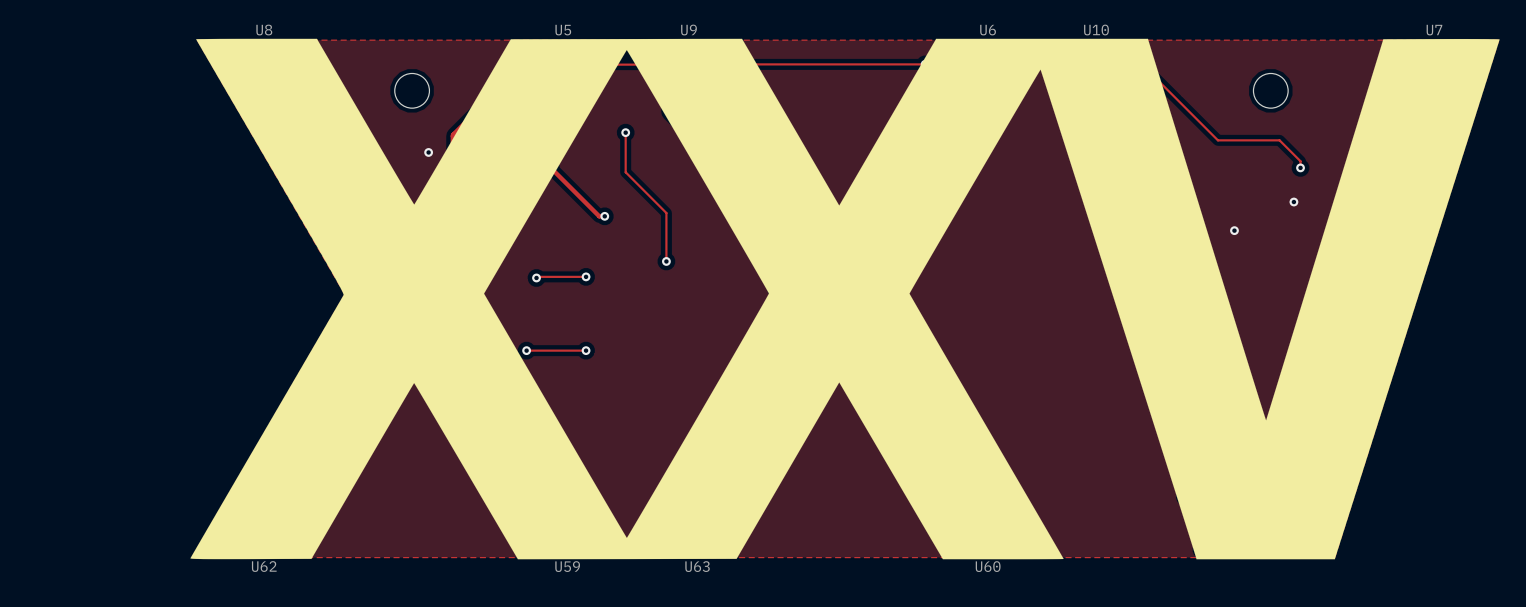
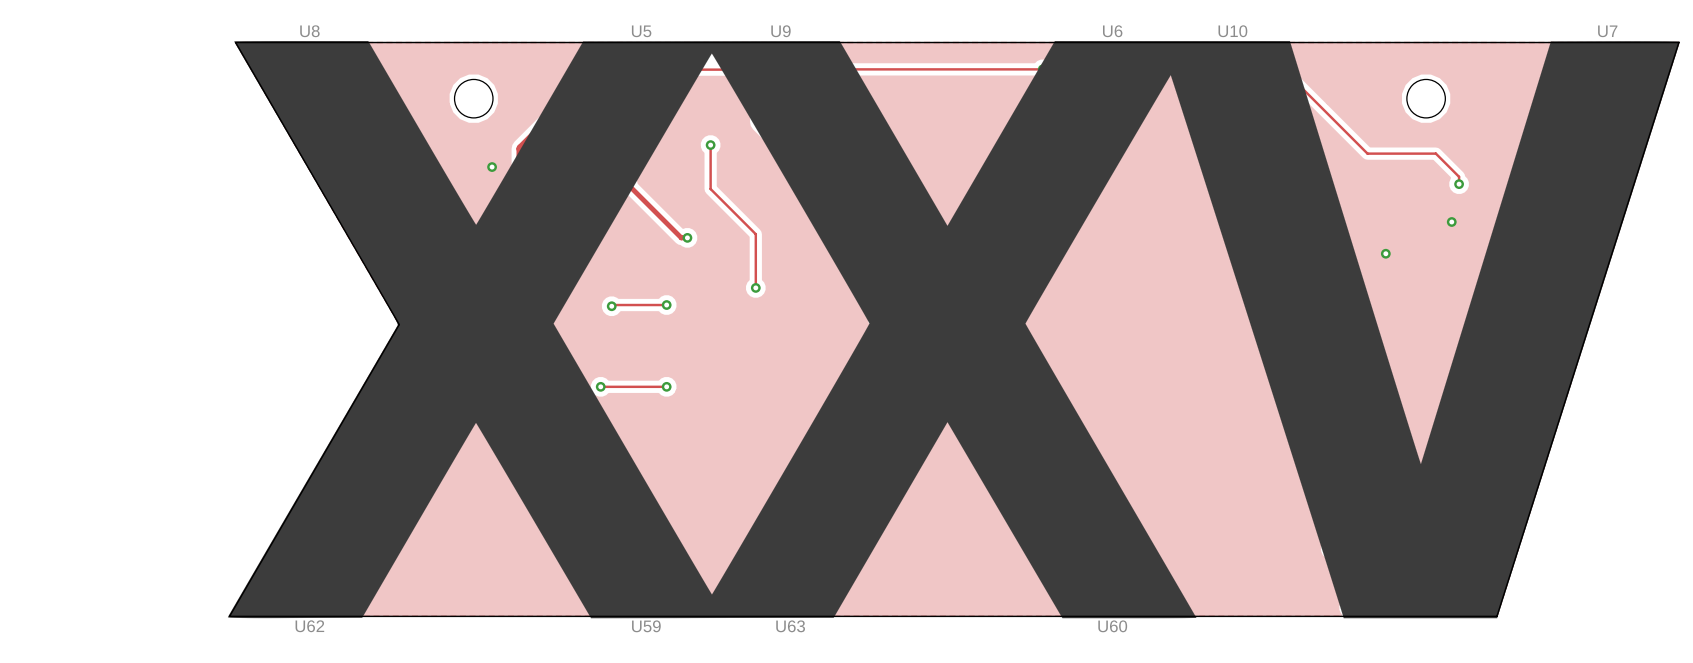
board edge: none -> (235, 42) (1678, 42) (1496, 616) (229, 616) (399, 324) (235, 42)

